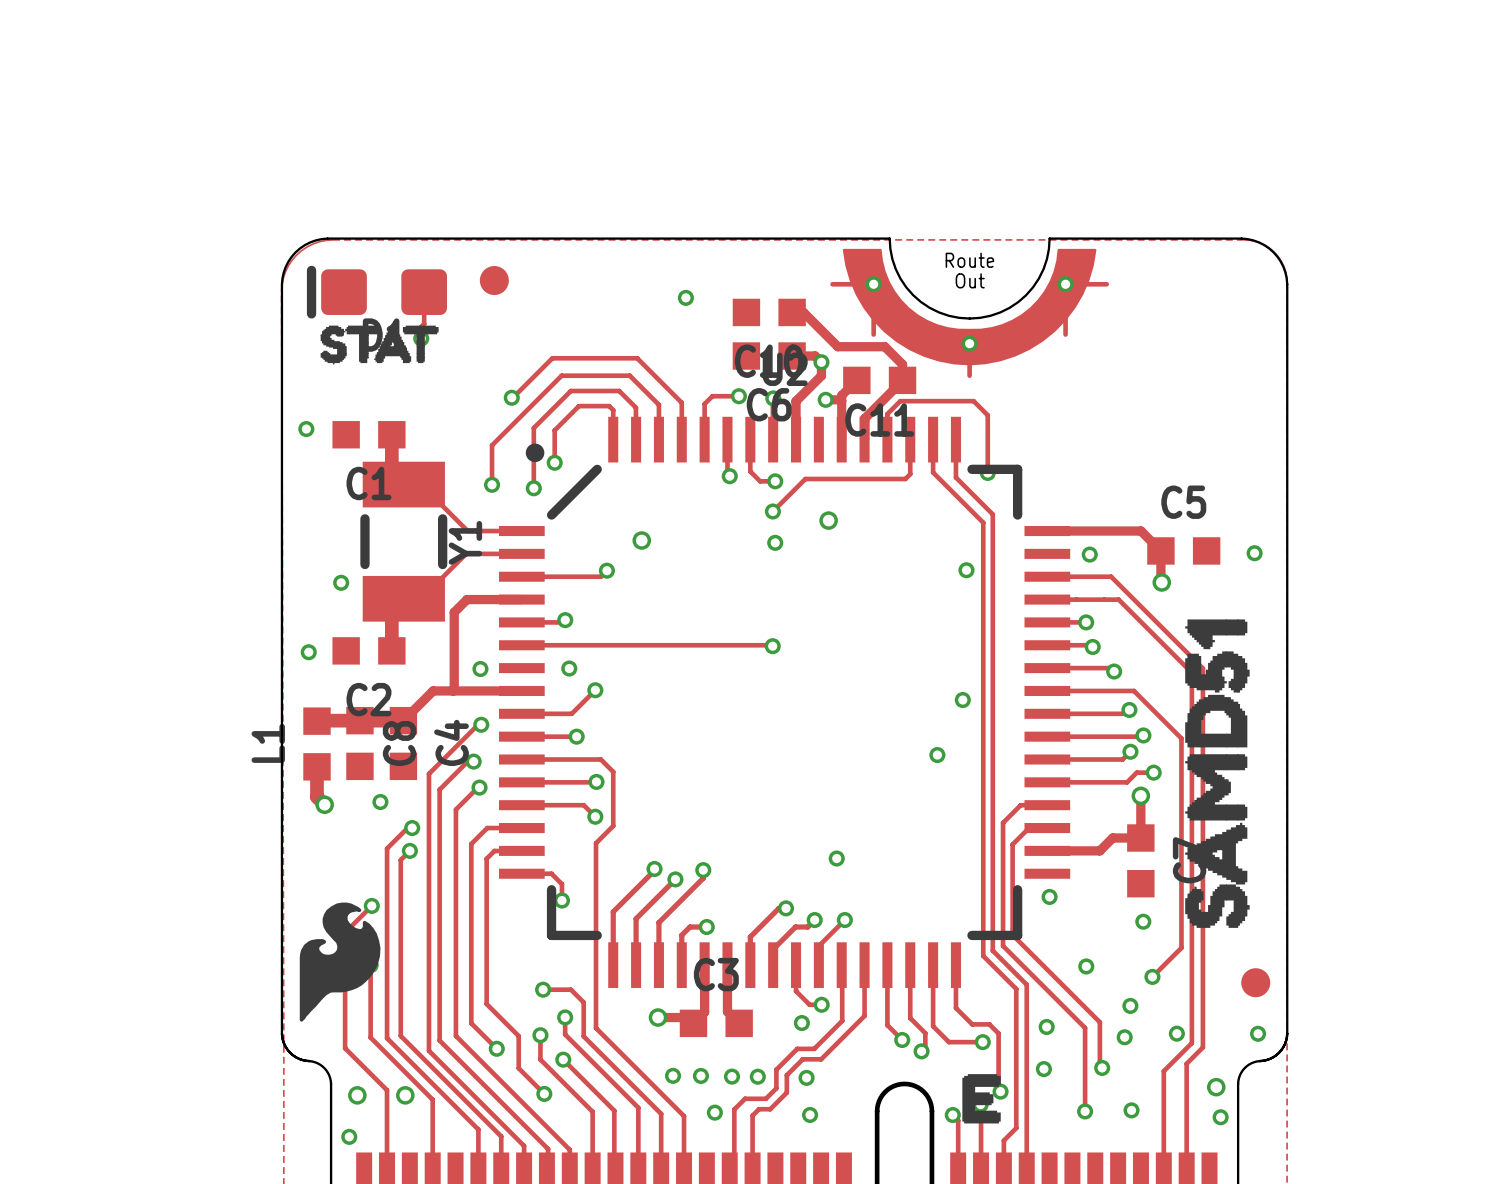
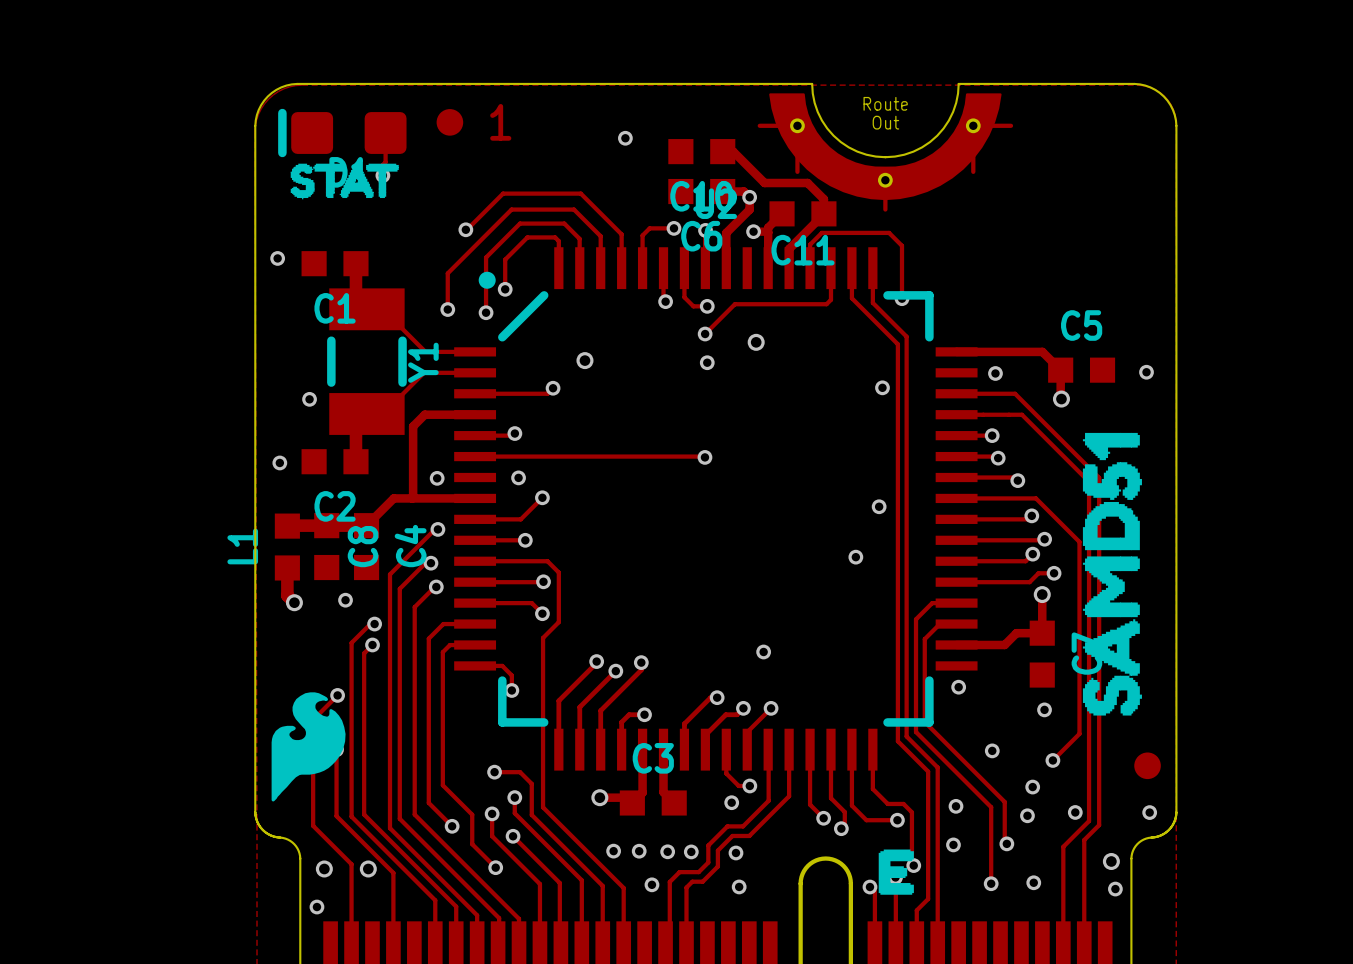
text: none -> 1 (500, 122)

